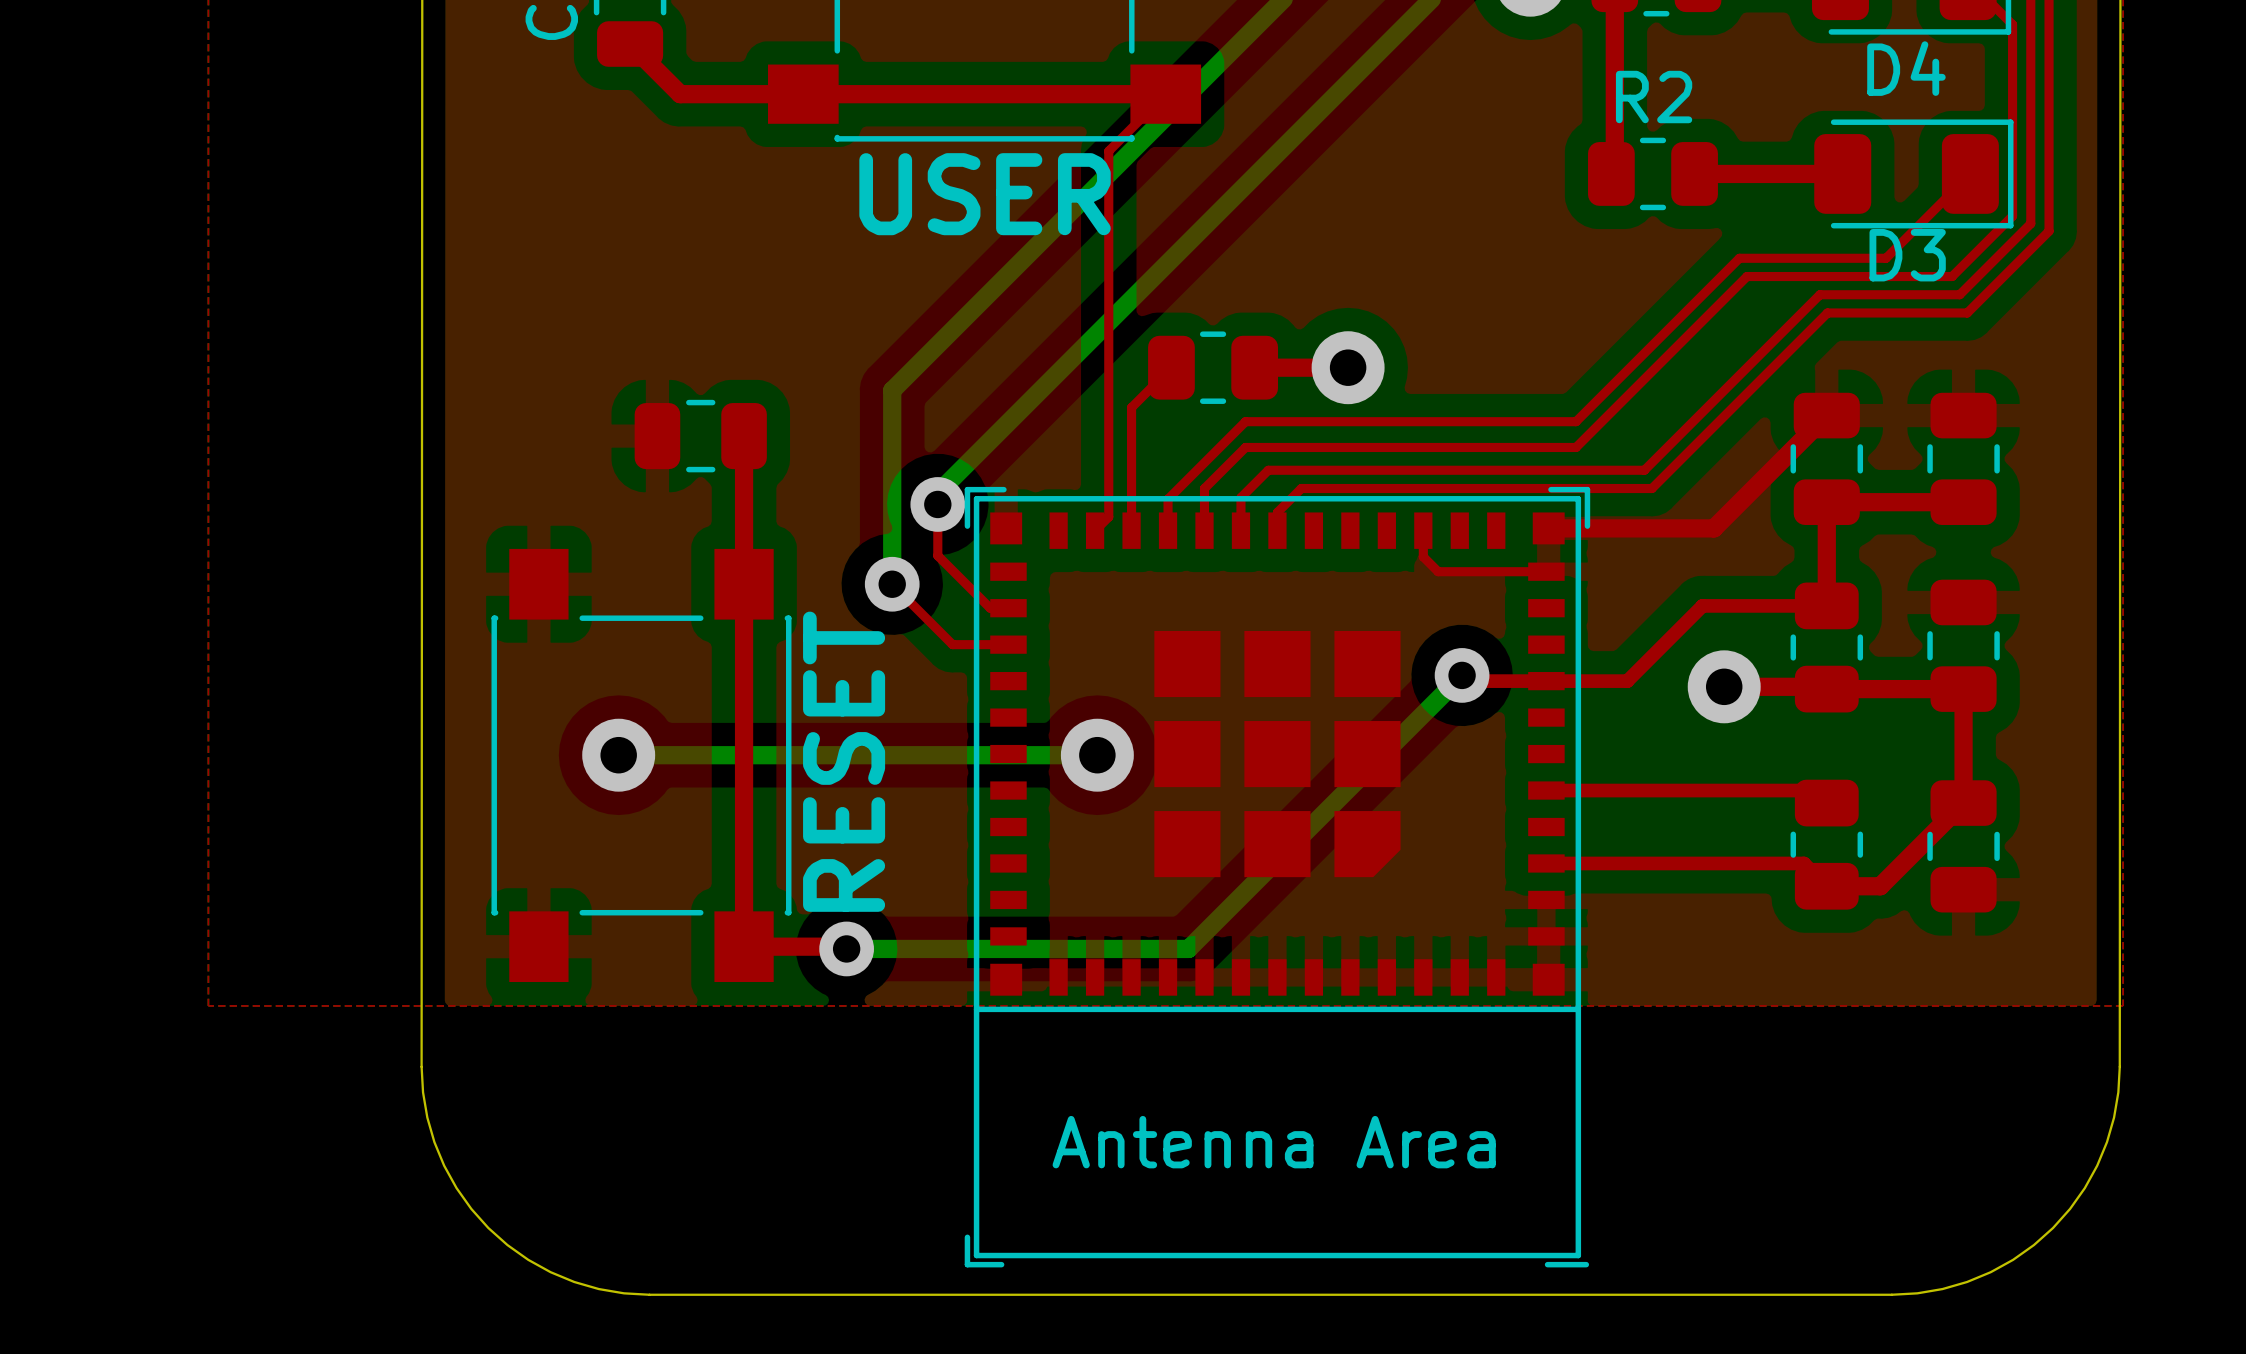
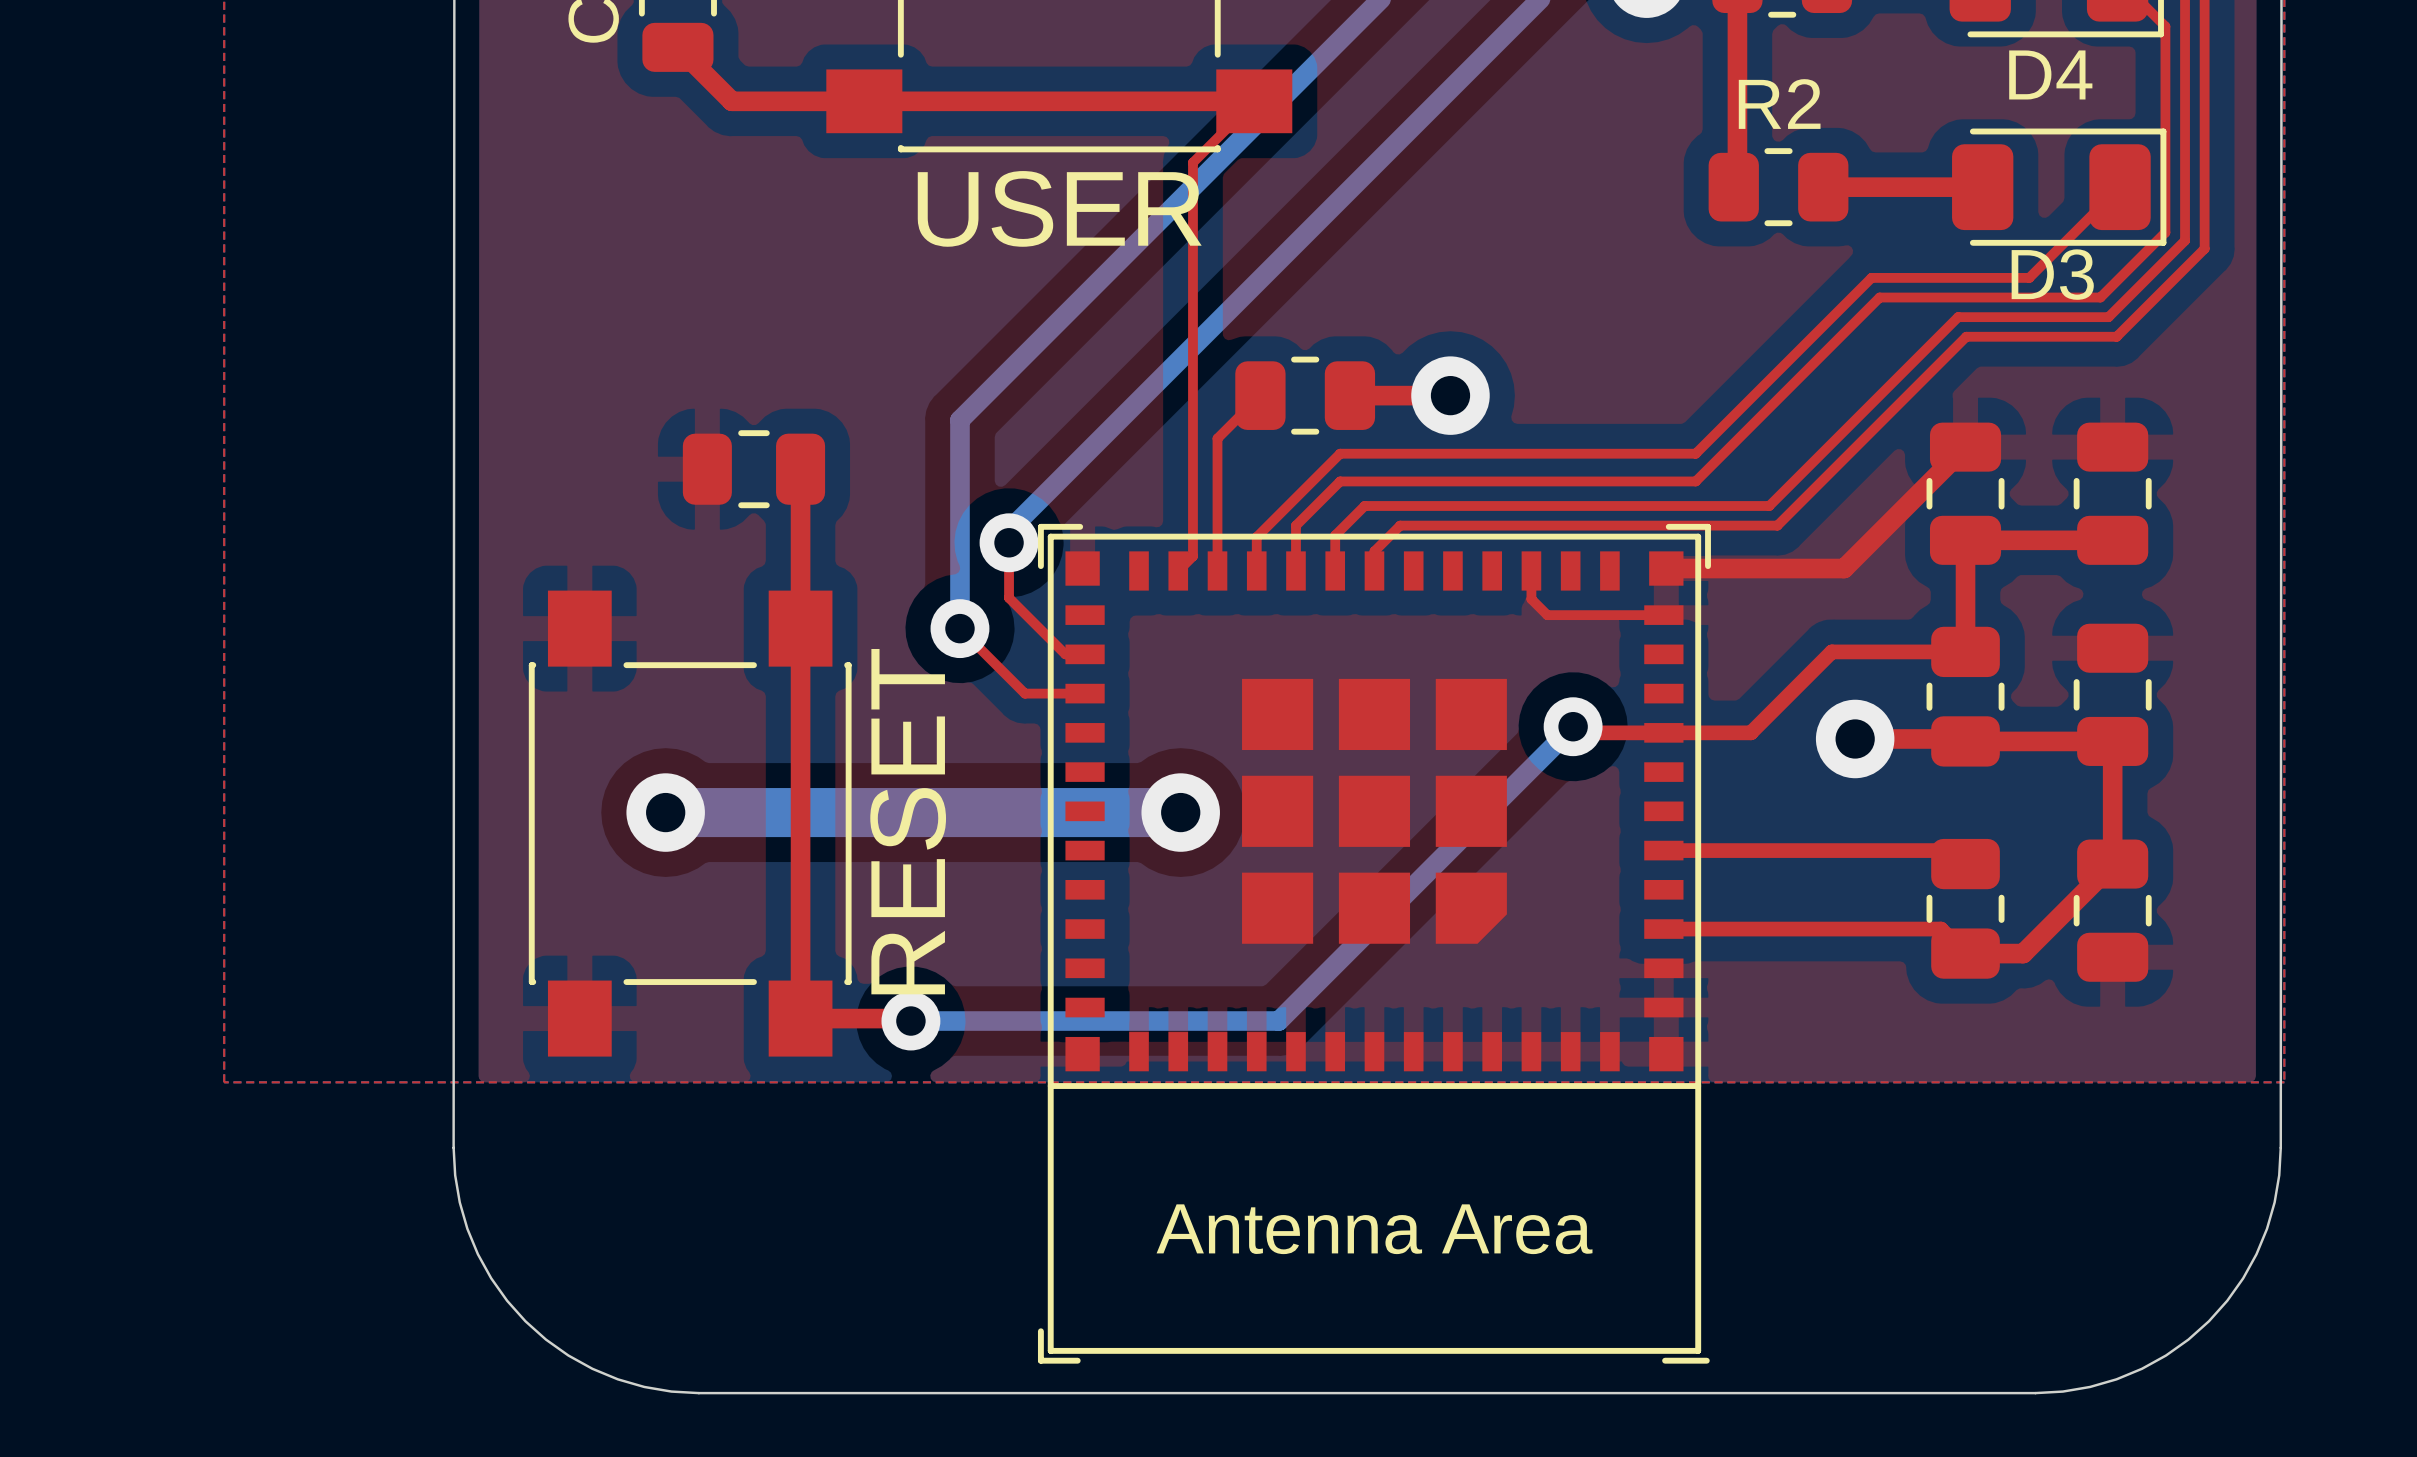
bottom track width: thin (618, 755) (1097, 755) -> thick (665, 812) (1180, 812)

